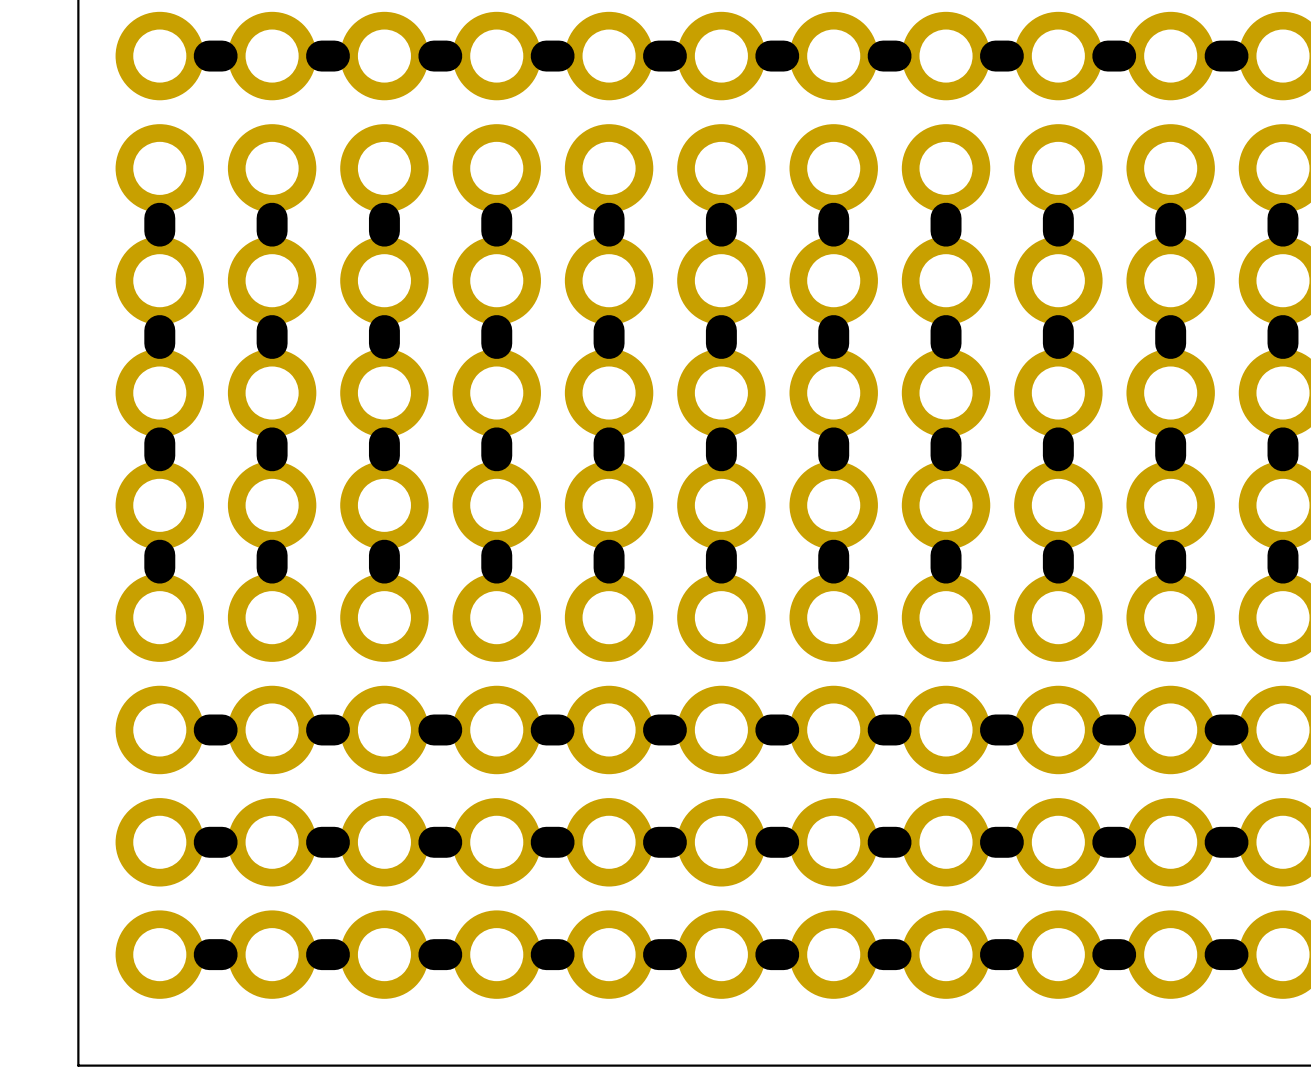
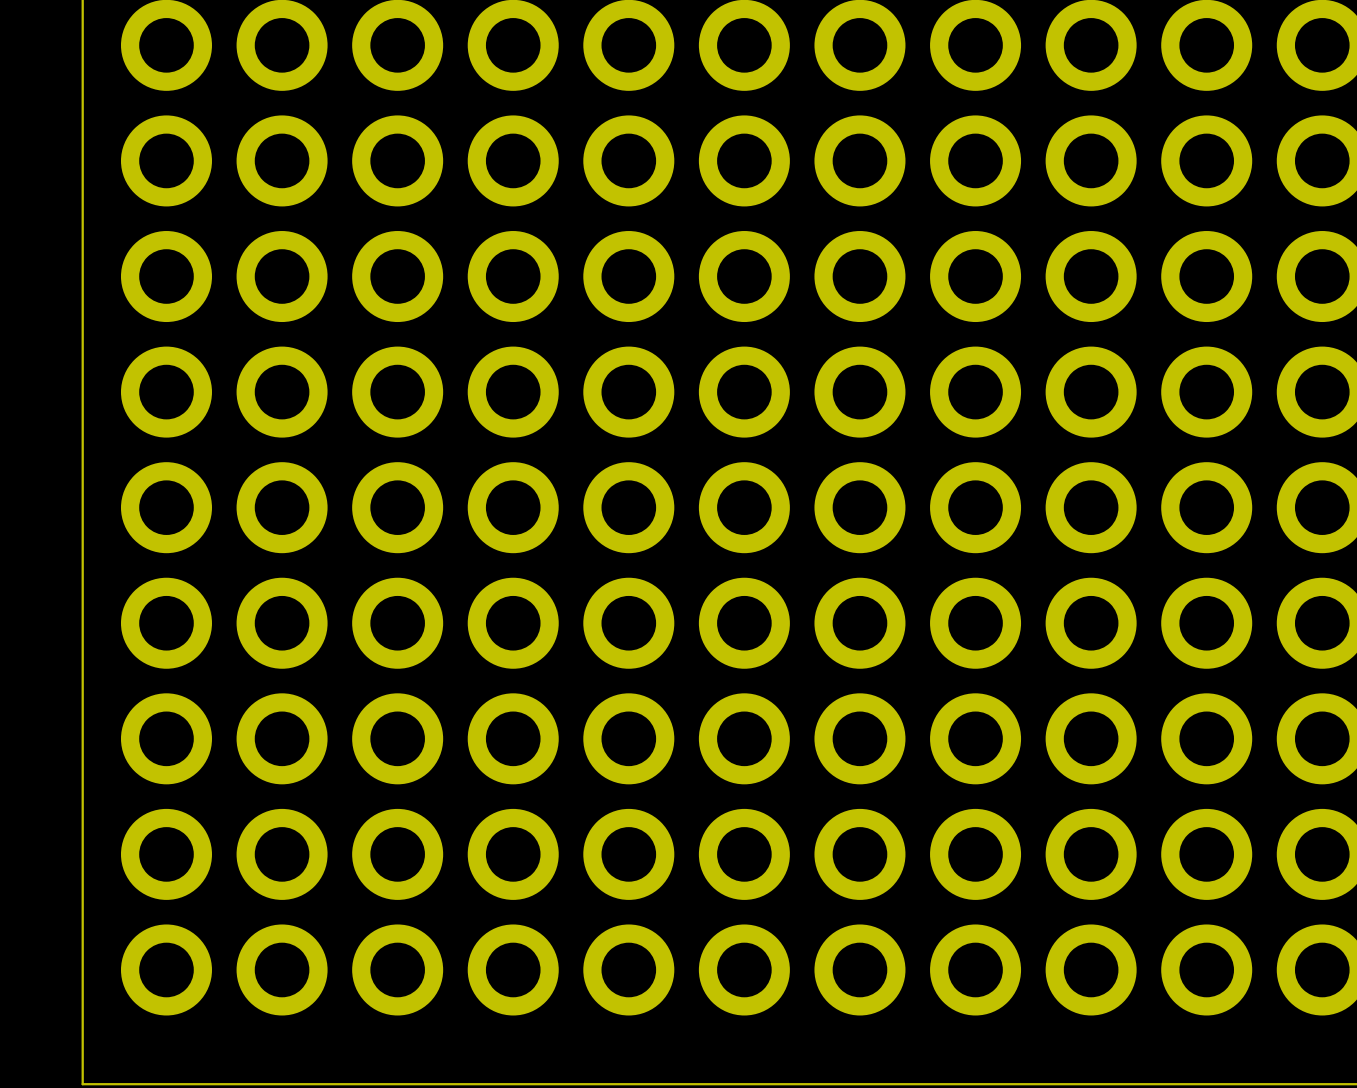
line: (209, 56) (222, 56) -> none
line: (321, 56) (334, 56) -> none
line: (433, 56) (446, 56) -> none
line: (546, 56) (559, 56) -> none
line: (658, 56) (671, 56) -> none
line: (770, 56) (783, 56) -> none
line: (883, 56) (896, 56) -> none
line: (995, 56) (1008, 56) -> none
line: (1107, 56) (1120, 56) -> none
line: (1220, 56) (1233, 56) -> none
line: (159, 218) (159, 231) -> none
line: (272, 218) (272, 231) -> none
line: (384, 218) (384, 231) -> none
line: (496, 218) (496, 231) -> none
line: (609, 218) (609, 231) -> none
line: (721, 218) (721, 231) -> none
line: (833, 218) (833, 231) -> none
line: (946, 218) (946, 231) -> none
line: (1058, 218) (1058, 231) -> none
line: (1170, 218) (1170, 231) -> none
line: (1282, 218) (1282, 231) -> none
line: (159, 330) (159, 343) -> none
line: (272, 330) (272, 343) -> none
line: (384, 330) (384, 343) -> none
line: (496, 330) (496, 343) -> none
line: (609, 330) (609, 343) -> none
line: (721, 330) (721, 343) -> none
line: (833, 330) (833, 343) -> none
line: (946, 330) (946, 343) -> none
line: (1058, 330) (1058, 343) -> none
line: (1170, 330) (1170, 343) -> none
line: (1282, 330) (1282, 343) -> none
line: (159, 442) (159, 455) -> none
line: (272, 442) (272, 455) -> none
line: (384, 442) (384, 455) -> none
line: (496, 442) (496, 455) -> none
line: (609, 442) (609, 455) -> none
line: (721, 442) (721, 455) -> none
line: (833, 442) (833, 455) -> none
line: (946, 442) (946, 455) -> none
line: (1058, 442) (1058, 455) -> none
line: (1170, 442) (1170, 455) -> none
line: (1282, 442) (1282, 455) -> none
line: (159, 555) (159, 568) -> none
line: (272, 555) (272, 568) -> none
line: (384, 555) (384, 568) -> none
line: (496, 555) (496, 568) -> none
line: (609, 555) (609, 568) -> none
line: (721, 555) (721, 568) -> none
line: (833, 555) (833, 568) -> none
line: (946, 555) (946, 568) -> none
line: (1058, 555) (1058, 568) -> none
line: (1170, 555) (1170, 568) -> none
line: (1282, 555) (1282, 568) -> none
line: (209, 729) (222, 729) -> none
line: (321, 729) (334, 729) -> none
line: (433, 729) (446, 729) -> none
line: (546, 729) (559, 729) -> none
line: (658, 729) (671, 729) -> none
line: (770, 729) (783, 729) -> none
line: (883, 729) (896, 729) -> none
line: (995, 729) (1008, 729) -> none
line: (1107, 729) (1120, 729) -> none
line: (1220, 729) (1233, 729) -> none
line: (209, 842) (222, 842) -> none
line: (321, 842) (334, 842) -> none
line: (433, 842) (446, 842) -> none
line: (546, 842) (559, 842) -> none
line: (658, 842) (671, 842) -> none
line: (770, 842) (783, 842) -> none
line: (883, 842) (896, 842) -> none
line: (995, 842) (1008, 842) -> none
line: (1107, 842) (1120, 842) -> none
line: (1220, 842) (1233, 842) -> none
line: (209, 954) (222, 954) -> none
line: (321, 954) (334, 954) -> none
line: (433, 954) (446, 954) -> none
line: (546, 954) (559, 954) -> none
line: (658, 954) (671, 954) -> none
line: (770, 954) (783, 954) -> none
line: (883, 954) (896, 954) -> none
line: (995, 954) (1008, 954) -> none
line: (1107, 954) (1120, 954) -> none
line: (1220, 954) (1233, 954) -> none

